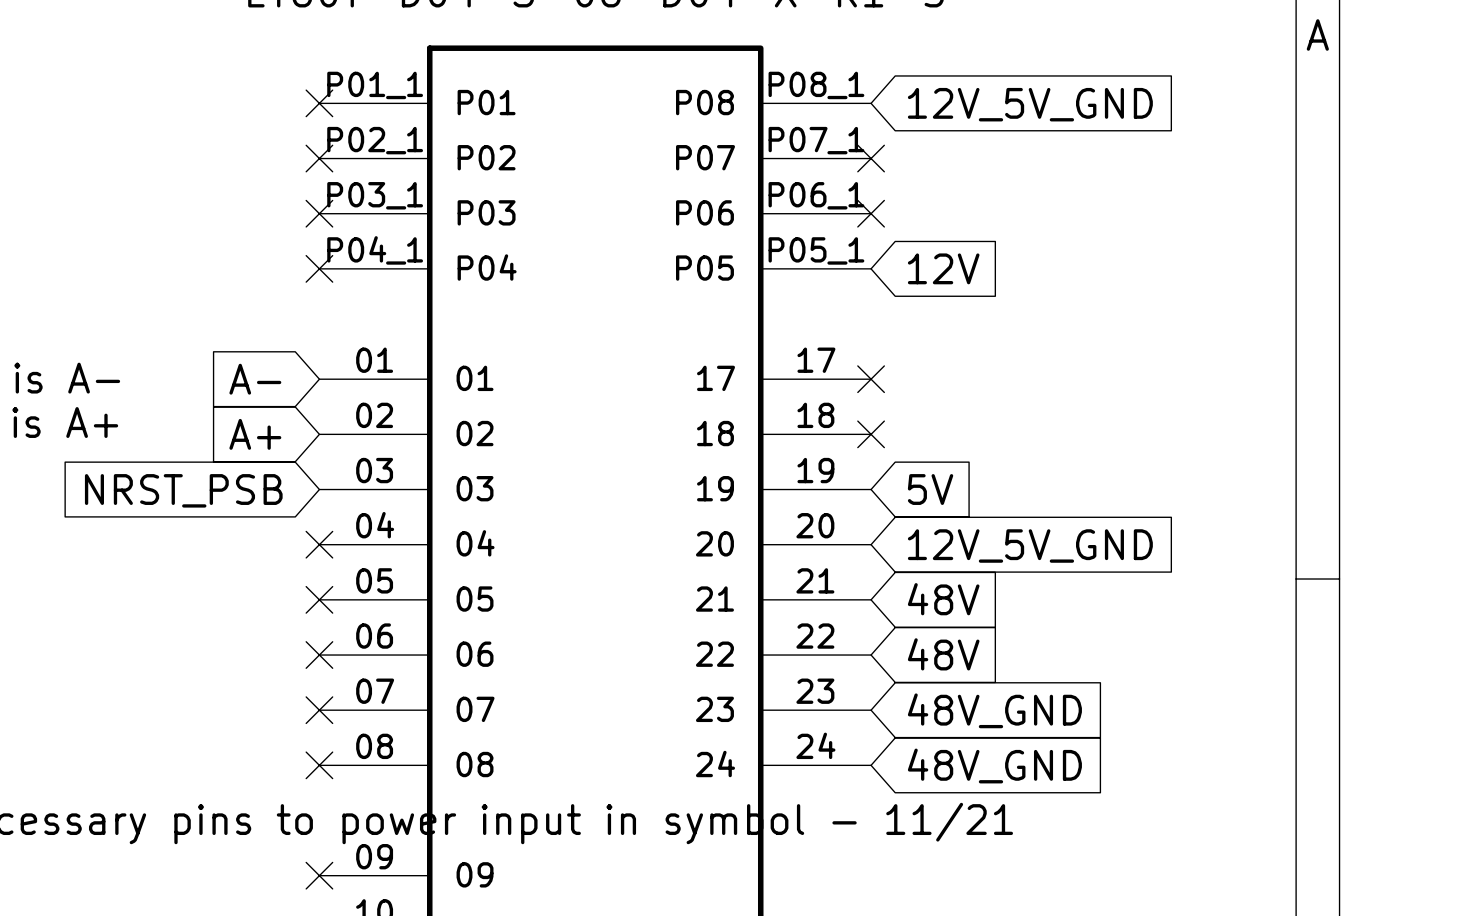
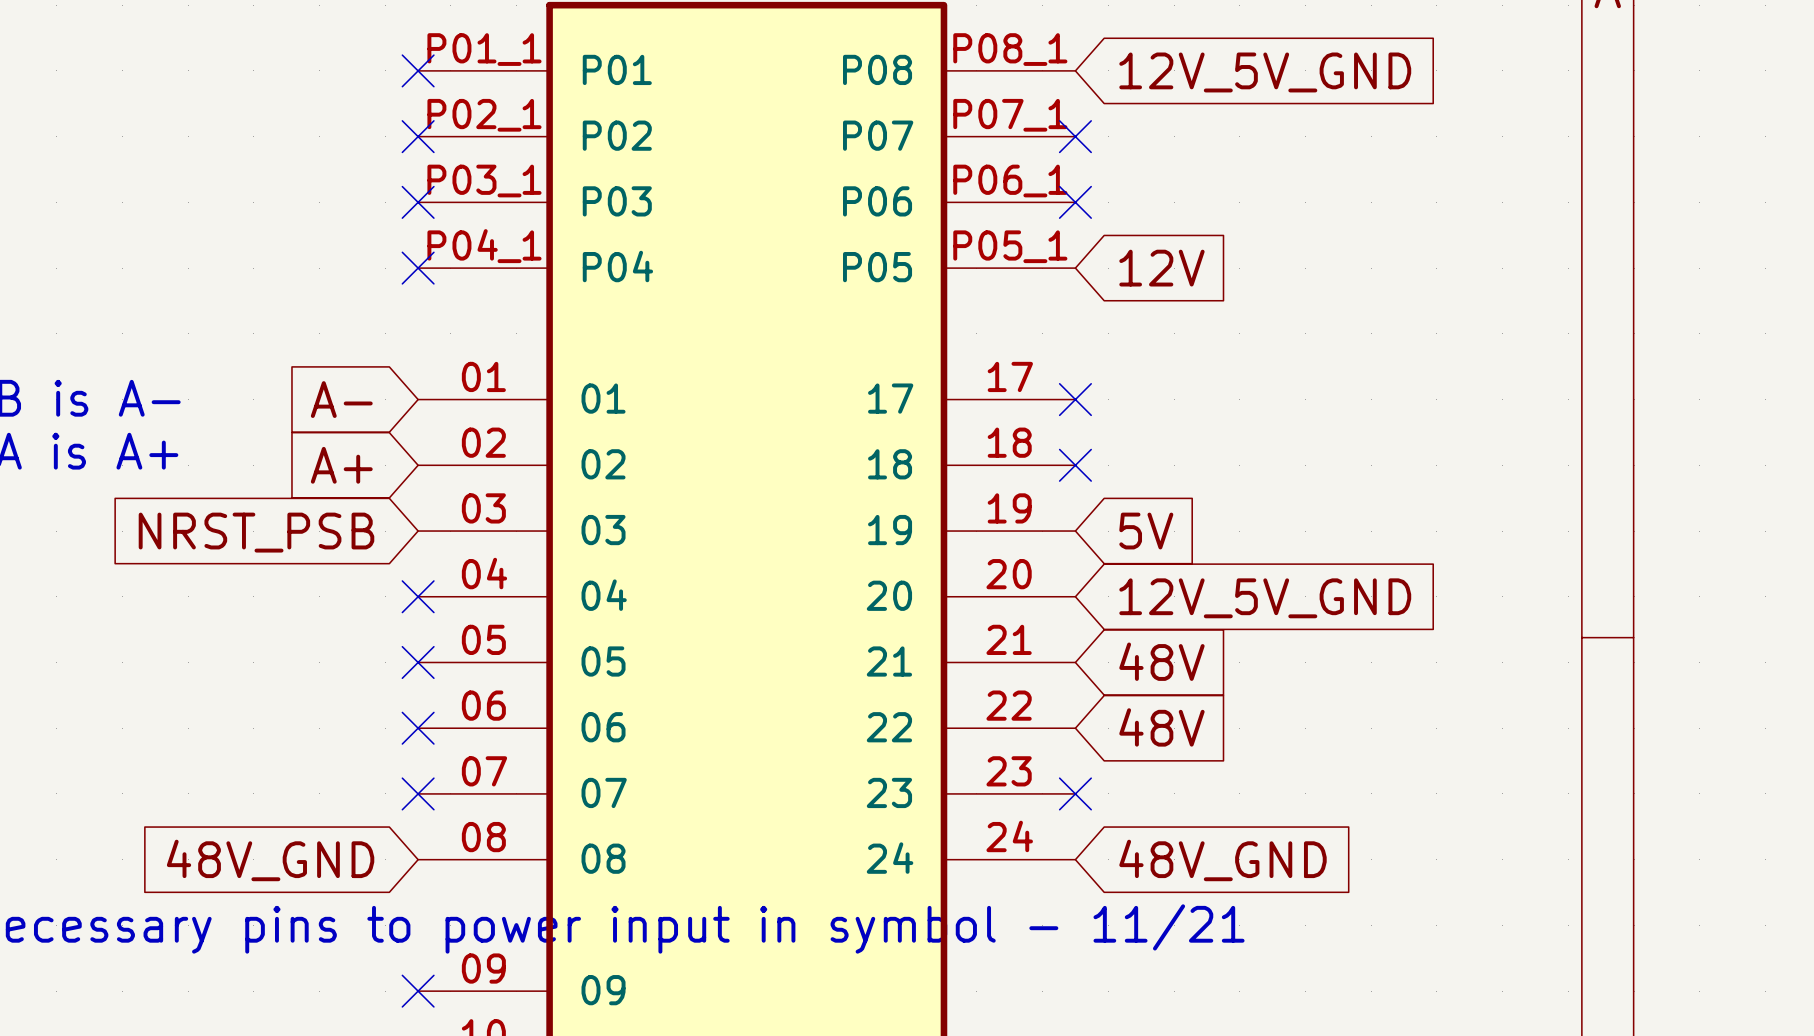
no-connect mark: none -> (1075, 793)
global label: 48V_GND (994, 710) -> none
no-connect mark: (319, 765) -> none
global label: none -> 48V_GND (270, 860)

